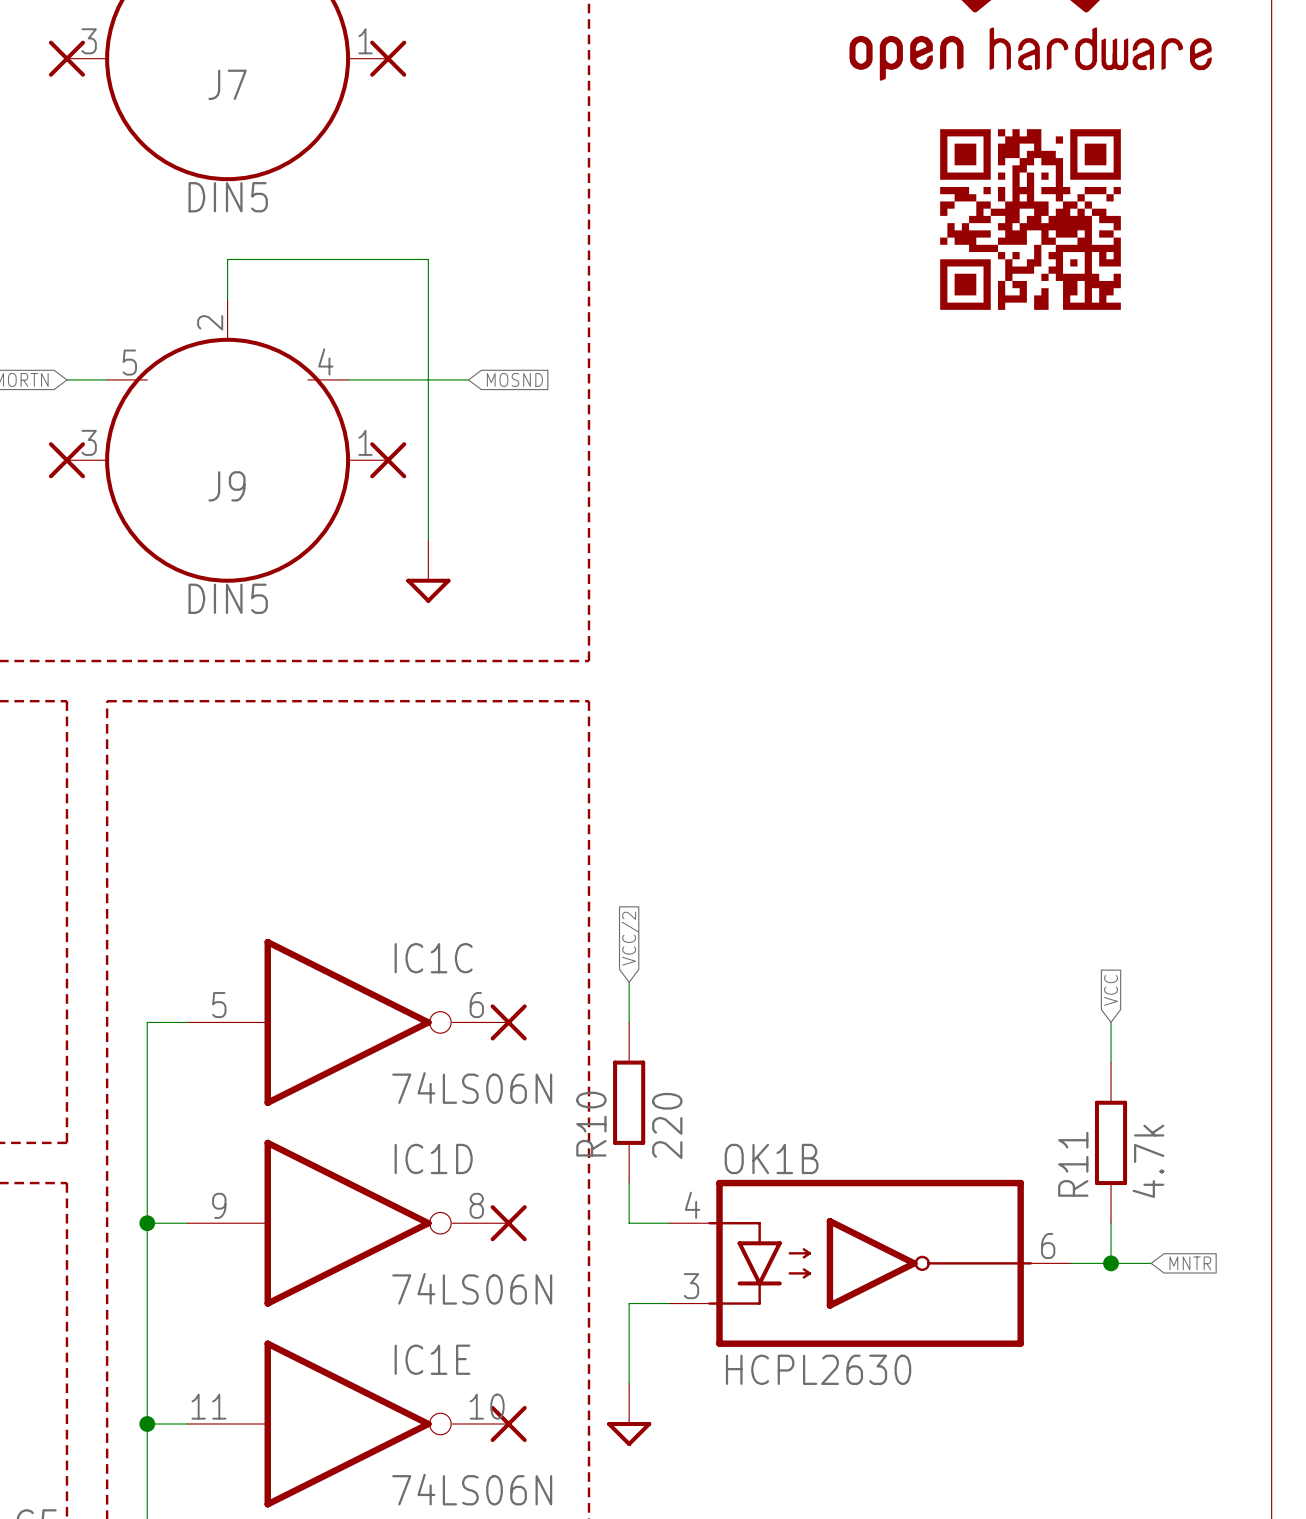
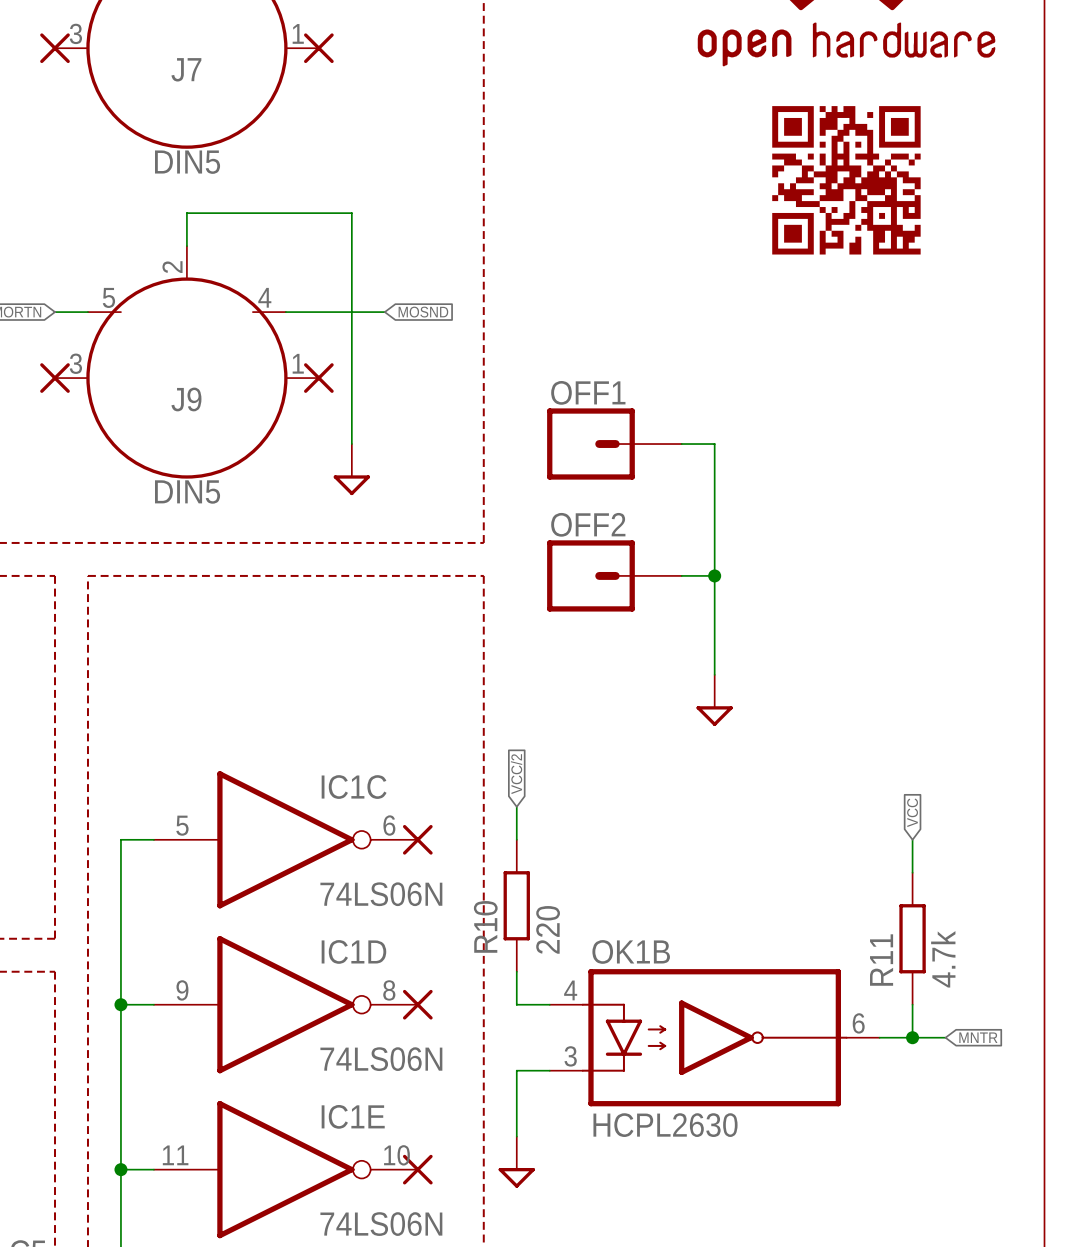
OFF1: none -> (614, 444)
wire: none -> (681, 444) (714, 444) (714, 674)
OFF2: none -> (614, 575)
wire: none -> (681, 575) (714, 575)
junction: none -> (714, 575)
power symbol: none -> (714, 700)

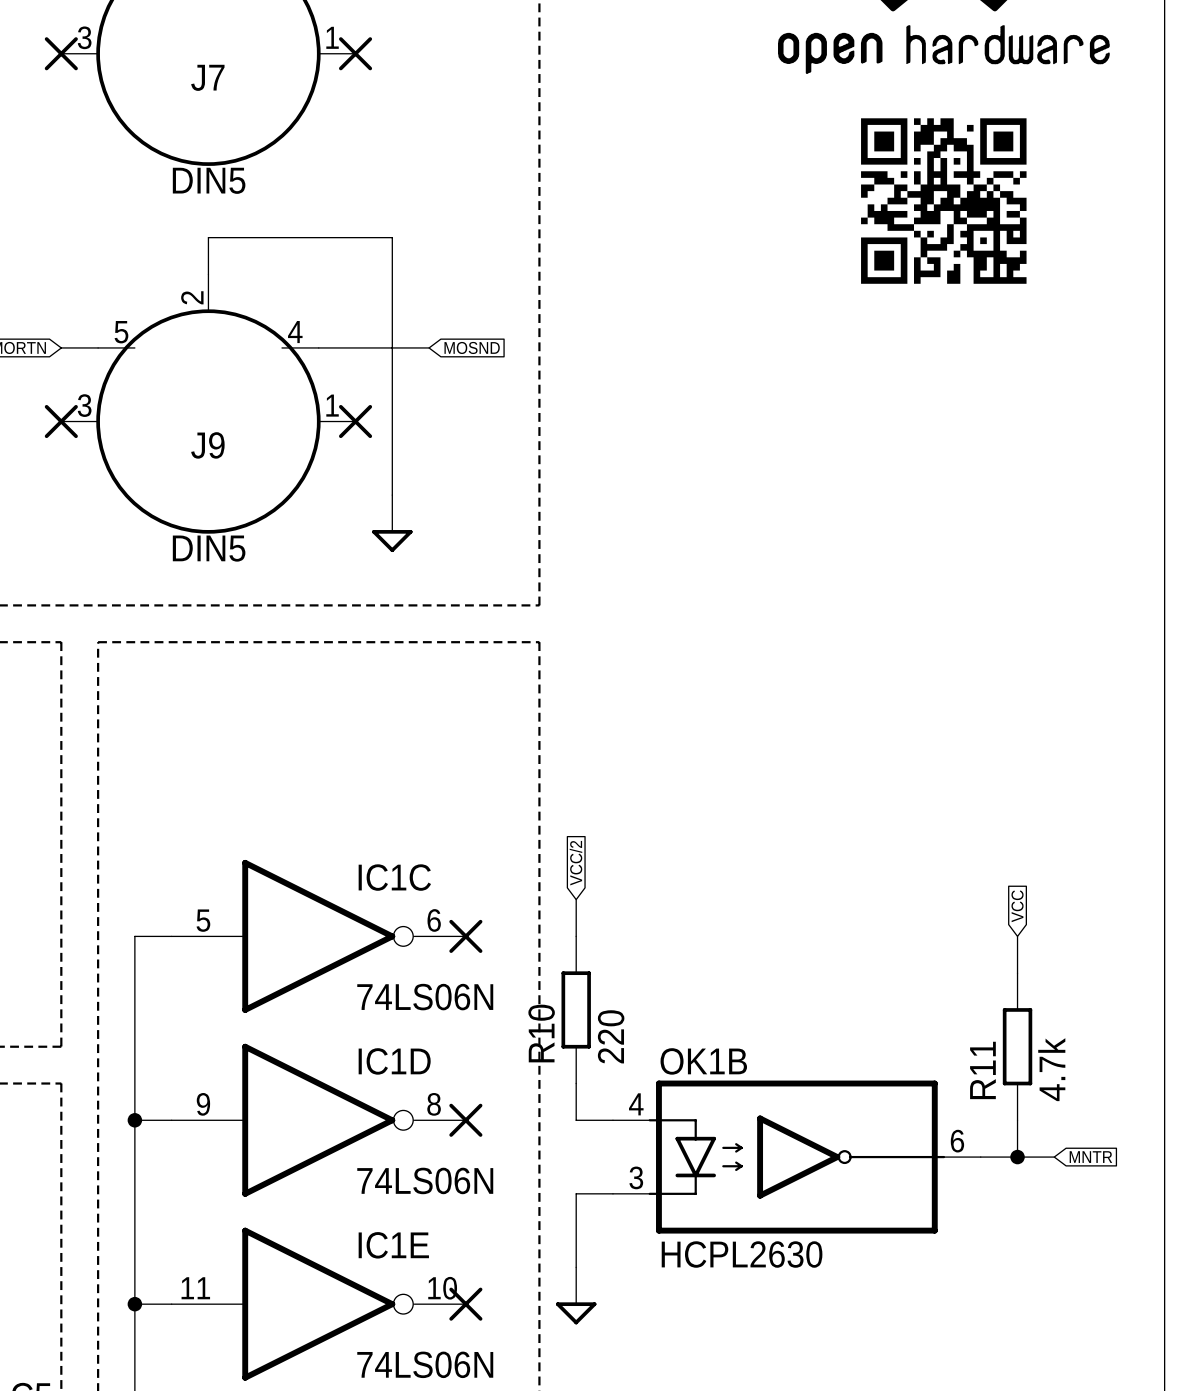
OFF1: (614, 444) -> none
wire: (681, 444) (714, 444) (714, 674) -> none
OFF2: (614, 575) -> none
wire: (681, 575) (714, 575) -> none
junction: (714, 575) -> none
power symbol: (714, 700) -> none

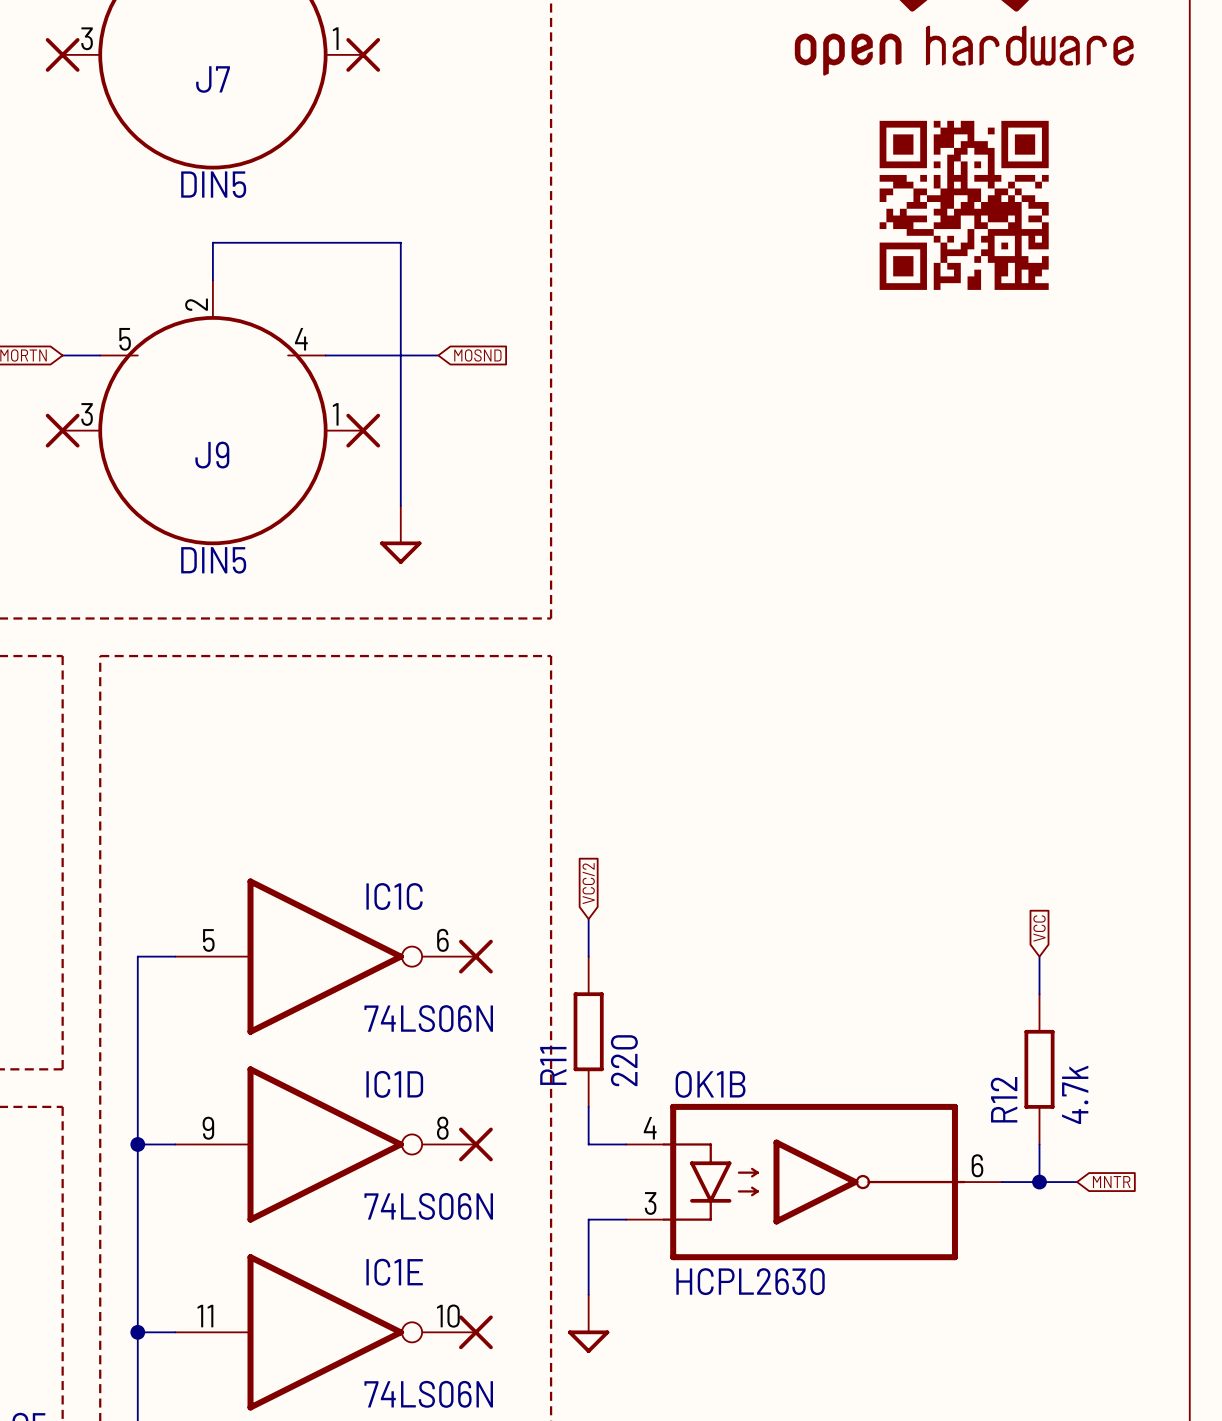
R10 name: R10 (541, 1033) -> R11 (553, 1065)
R11 name: R11 (982, 1070) -> R12 (1004, 1099)

